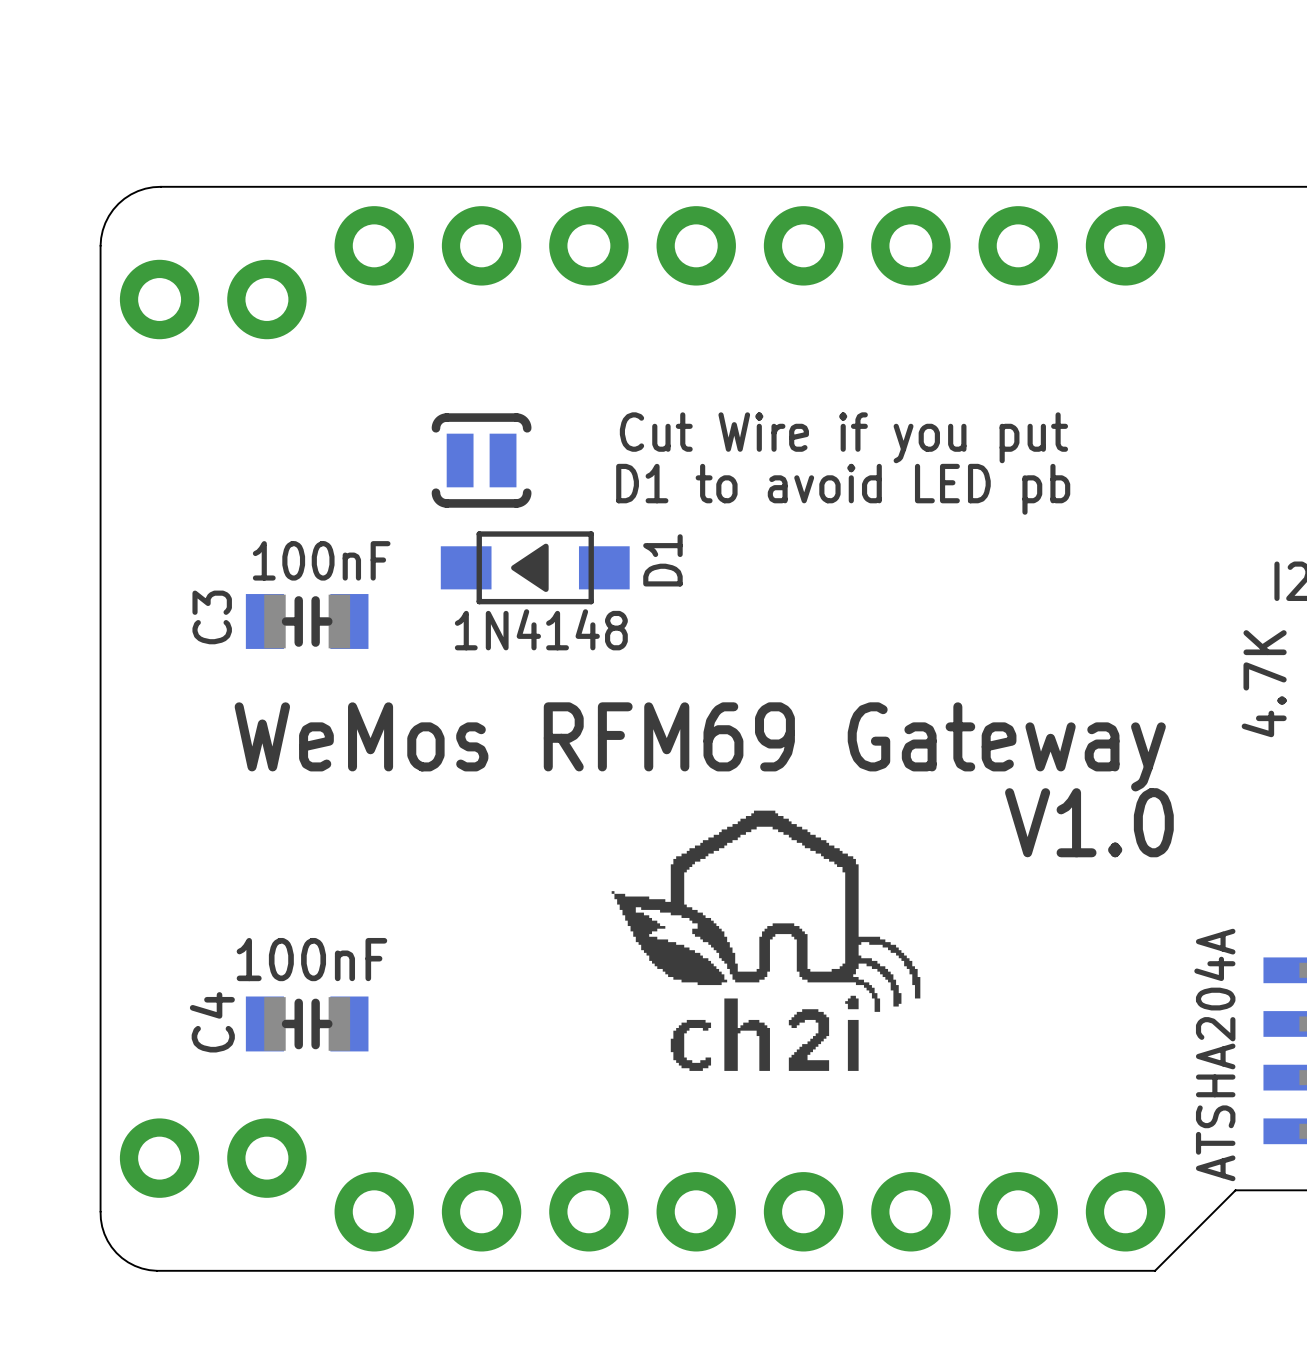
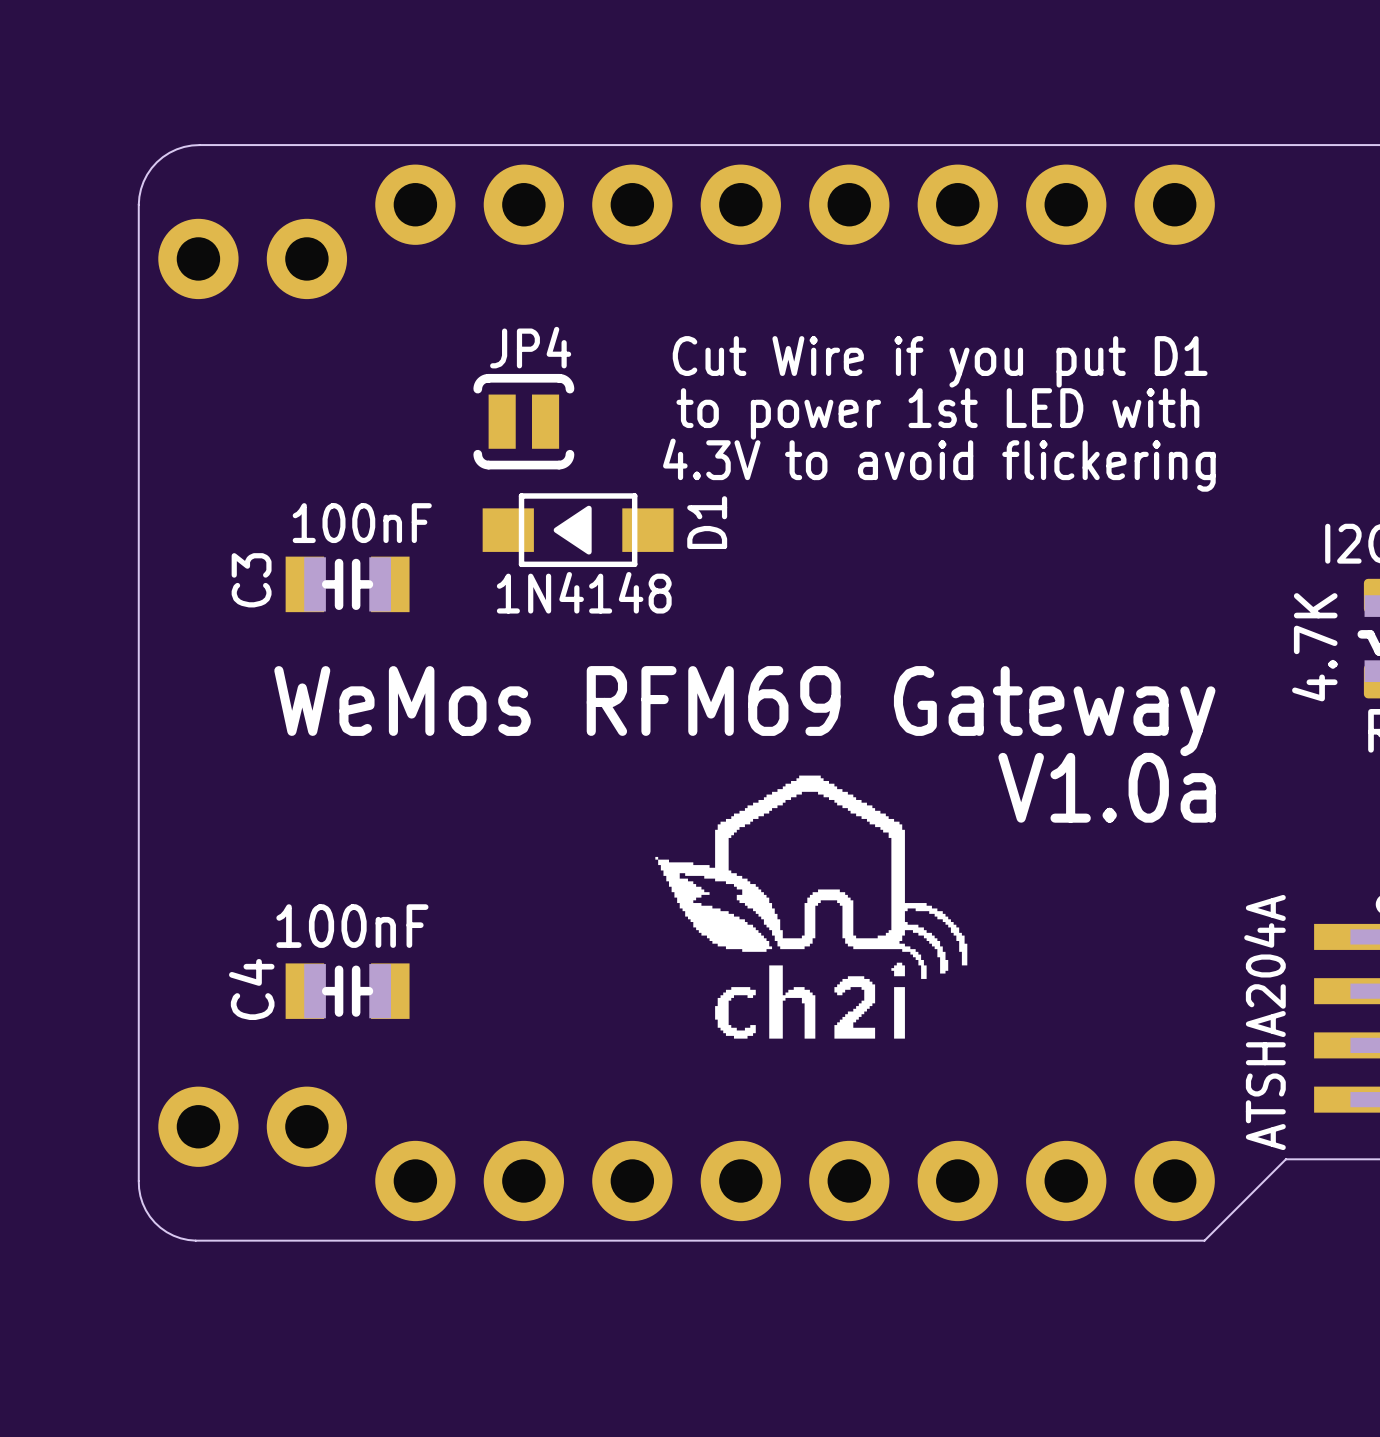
text: none -> JP4 (530, 347)
text: Cut Wire if you put (843, 437) -> Cut Wire if you put D1 (940, 361)
text: none -> to power 1st LED with (937, 413)
text: D1 to avoid LED pb (843, 489) -> none
text: none -> 4.3V to avoid flickering (939, 465)
text: V1.0 (1089, 822) -> V1.0a (1107, 787)

